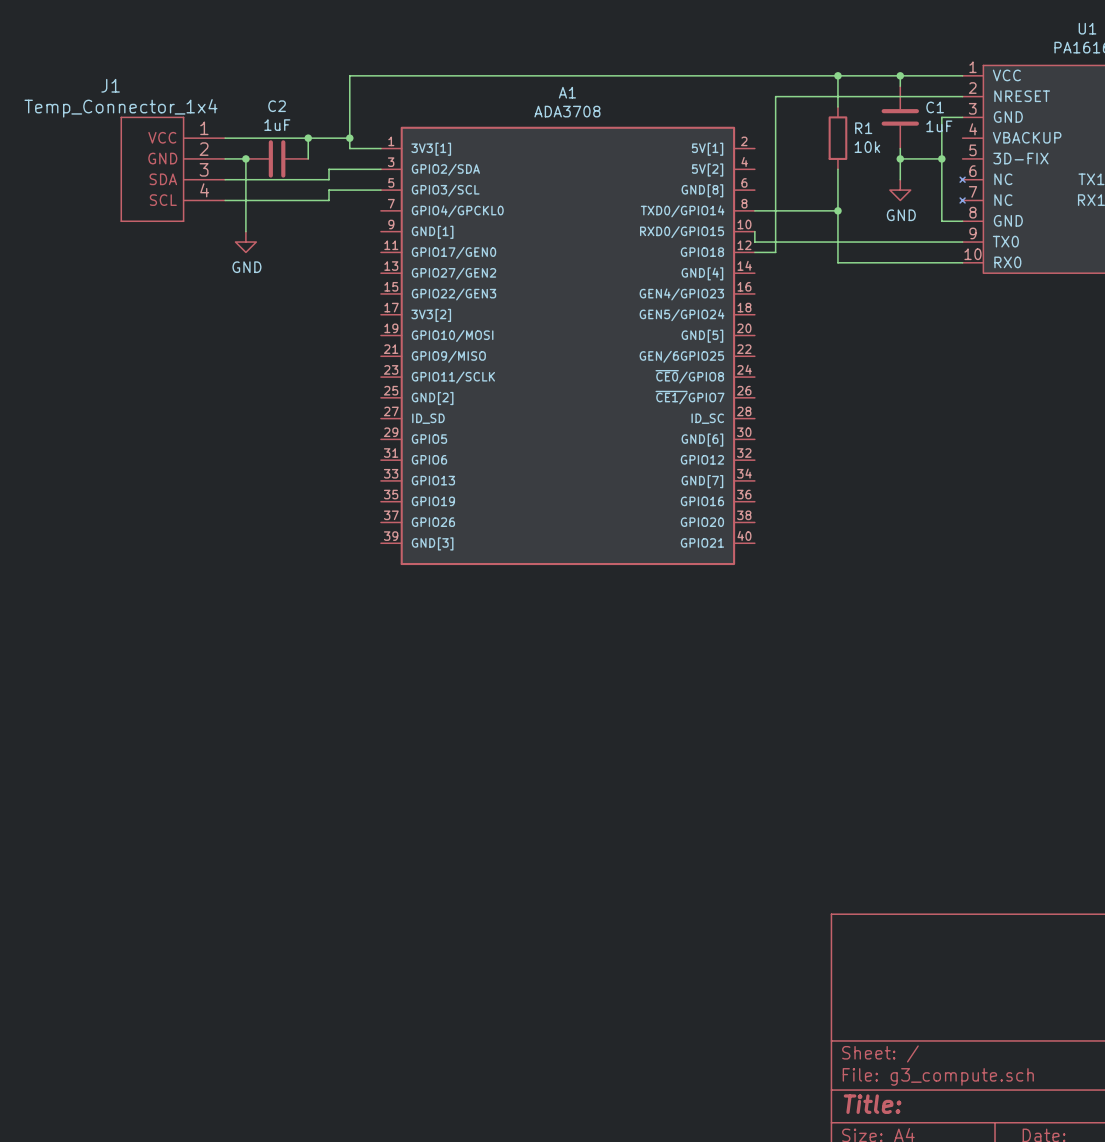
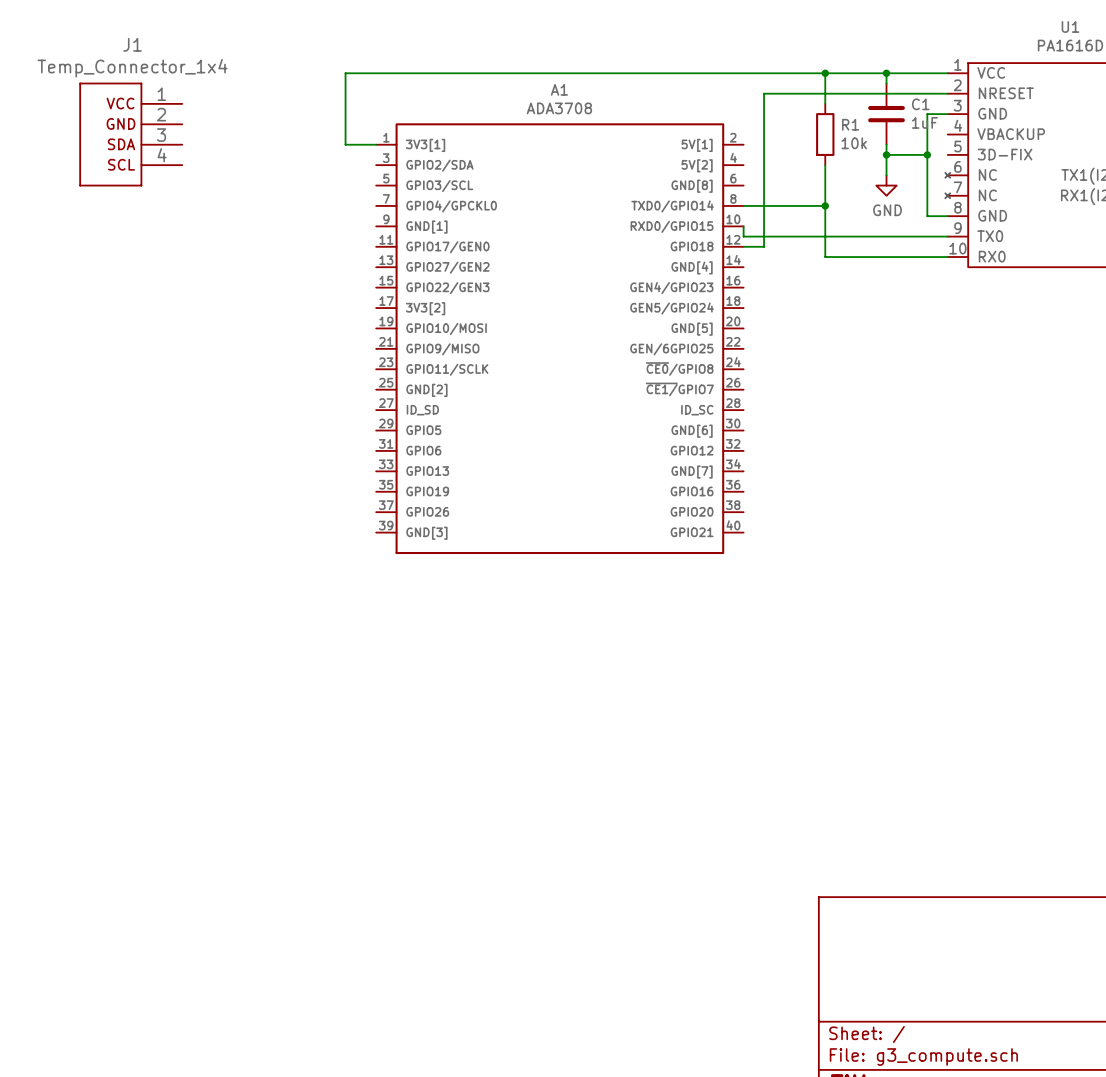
J1 name position: J1 (110, 85) -> J1 (132, 44)
J1 value position: Temp_Connector_1x4 (120, 108) -> Temp_Connector_1x4 (132, 68)
wire: (225, 138) (349, 138) -> none
wire: (308, 138) (308, 158) -> none
junction: (308, 138) -> none
junction: (349, 138) -> none
wire: (225, 158) (245, 158) (245, 231) -> none
junction: (245, 158) -> none
C2: 1uF (277, 158) -> none
J1 position: (172, 169) -> (130, 134)
wire: (380, 169) (329, 169) (329, 179) (225, 179) -> none
wire: (380, 190) (329, 190) (329, 200) (225, 200) -> none
power symbol: GND (245, 242) -> none

